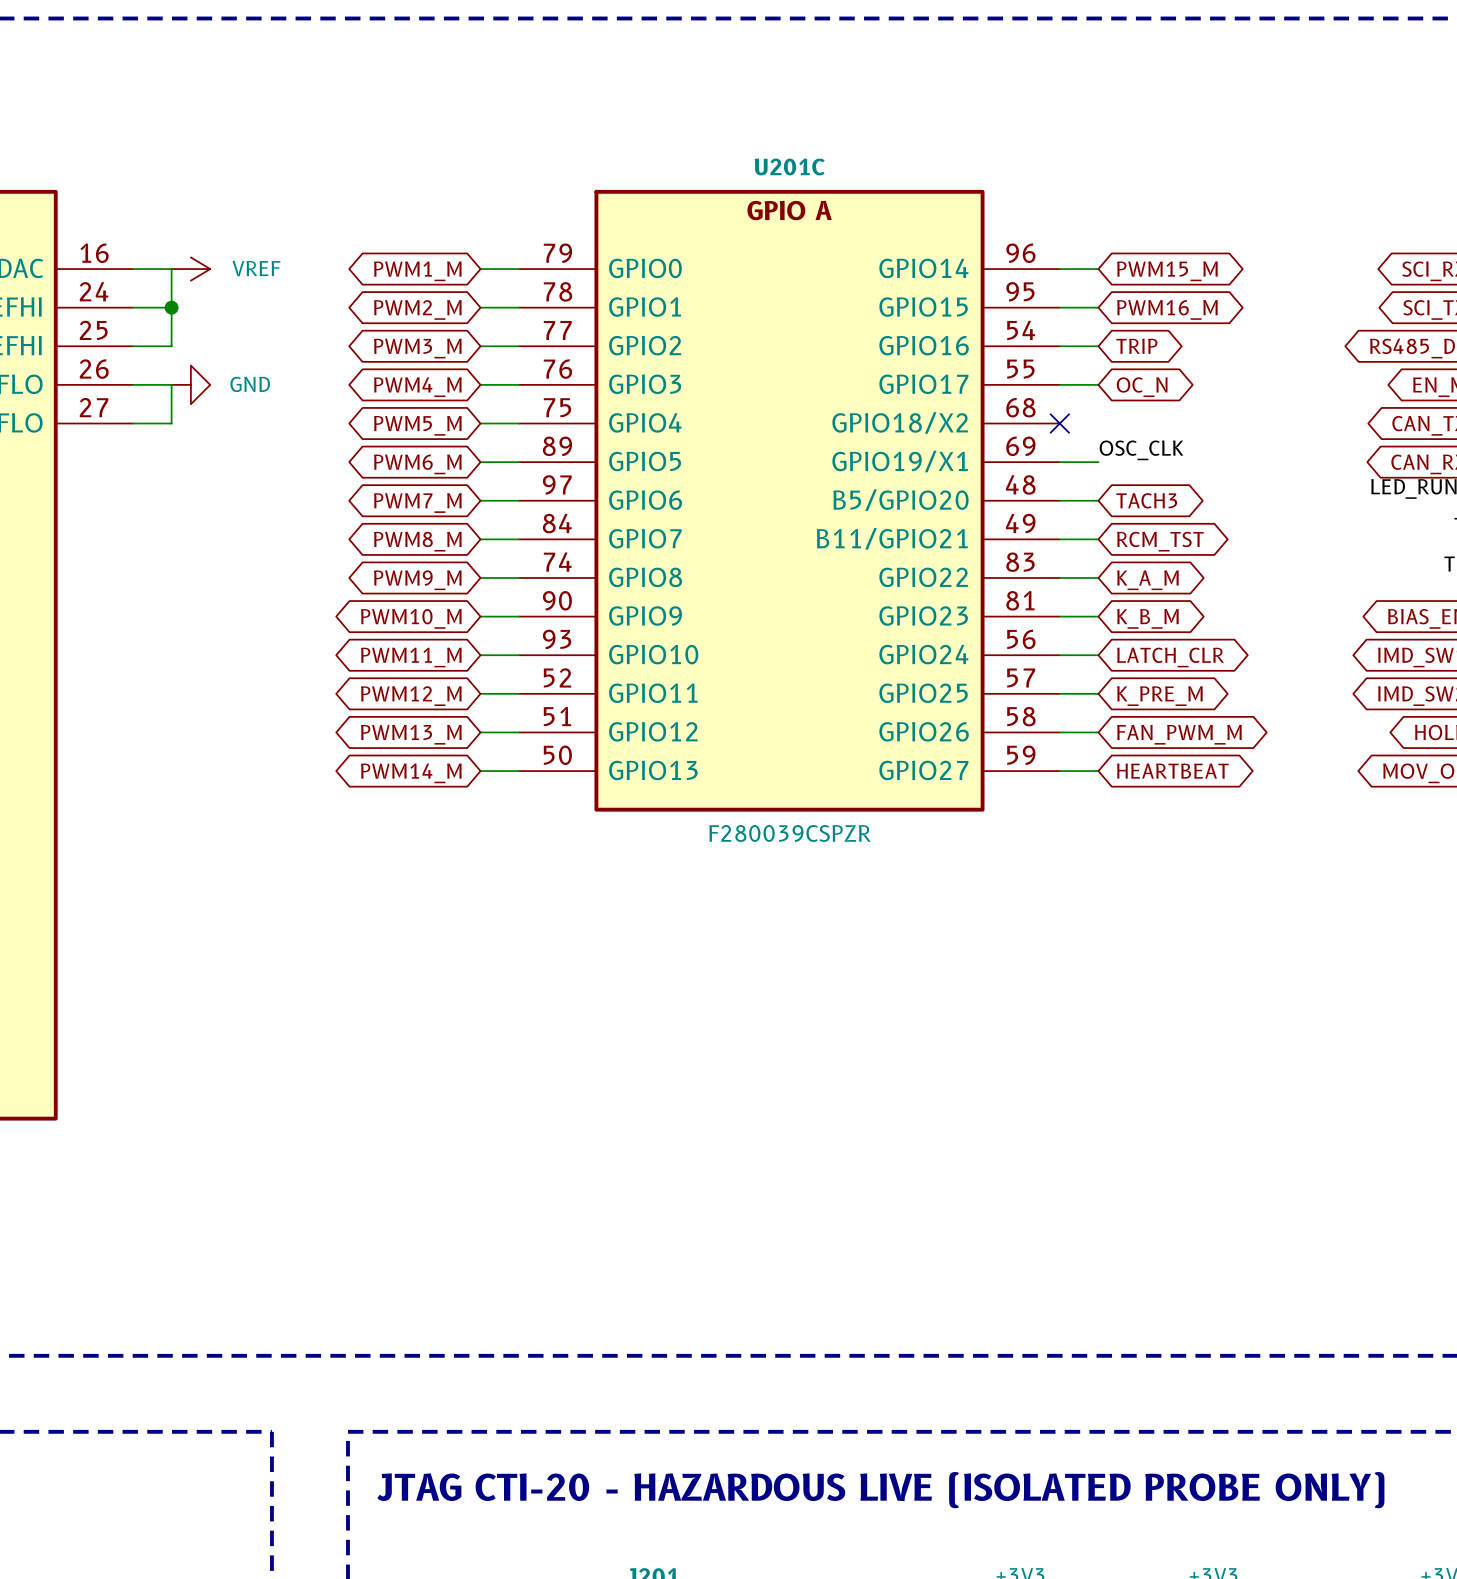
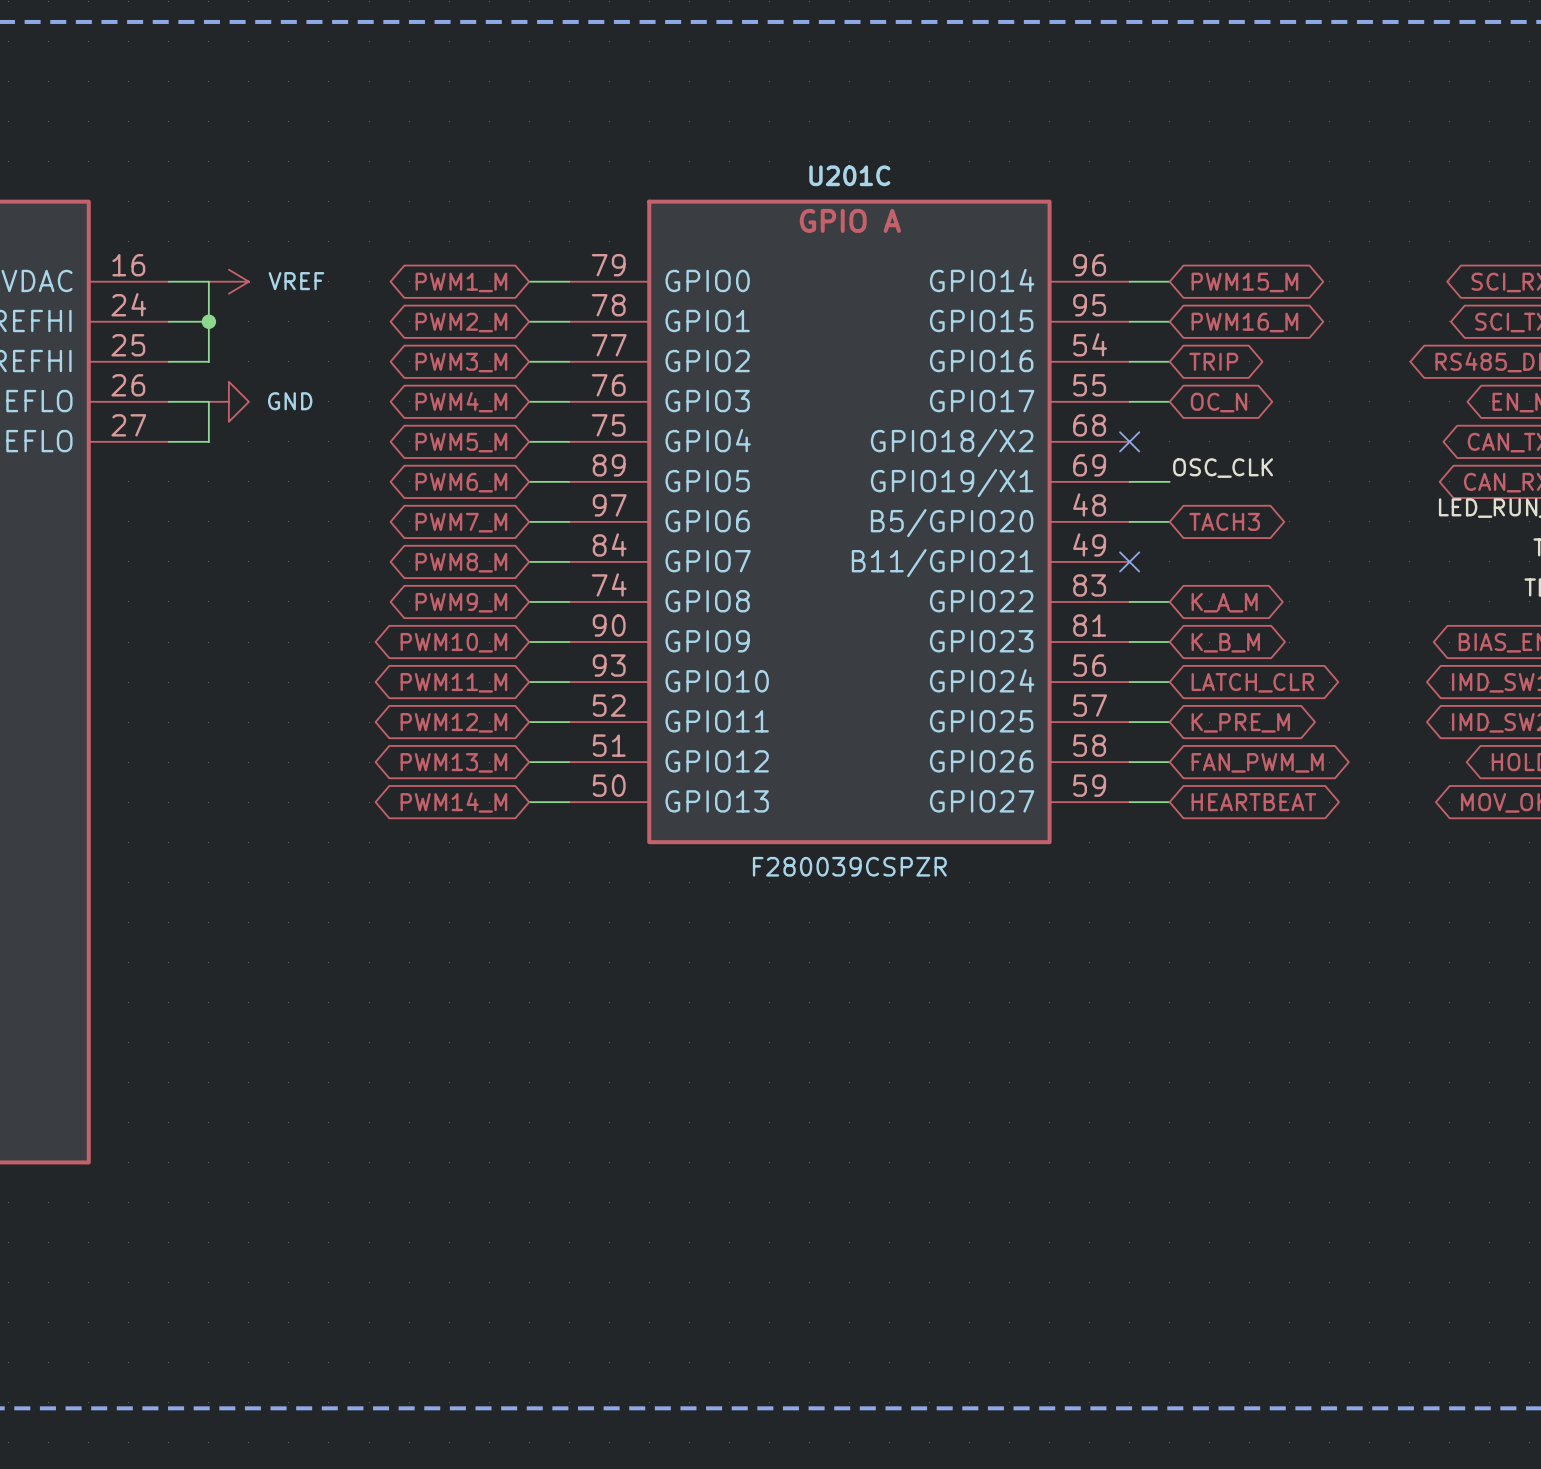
wire: (1059, 539) (1098, 539) -> none
no-connect mark: none -> (1129, 561)
global label: RCM_TST (1160, 541) -> none

